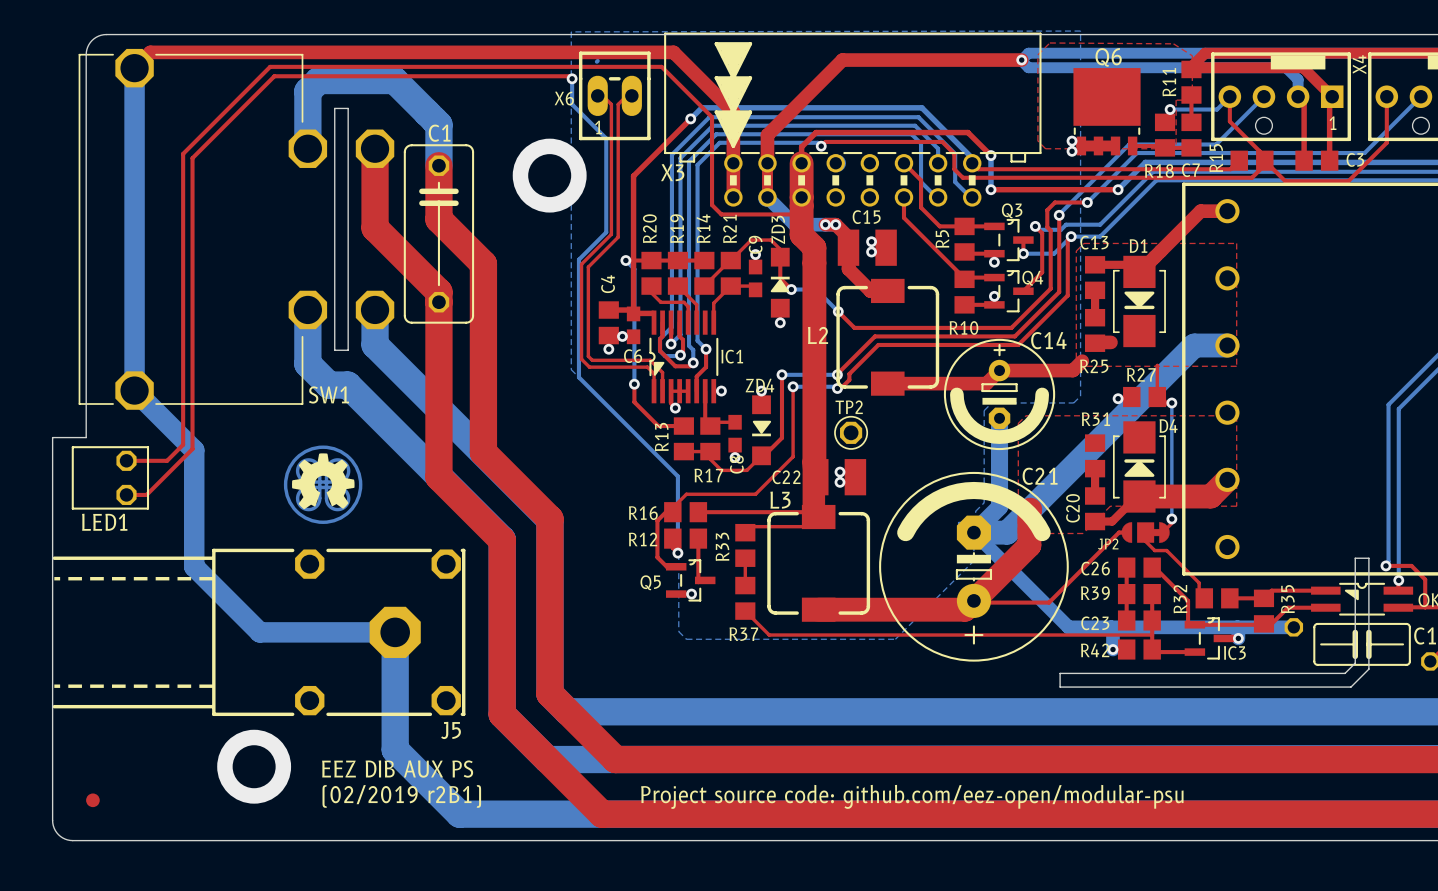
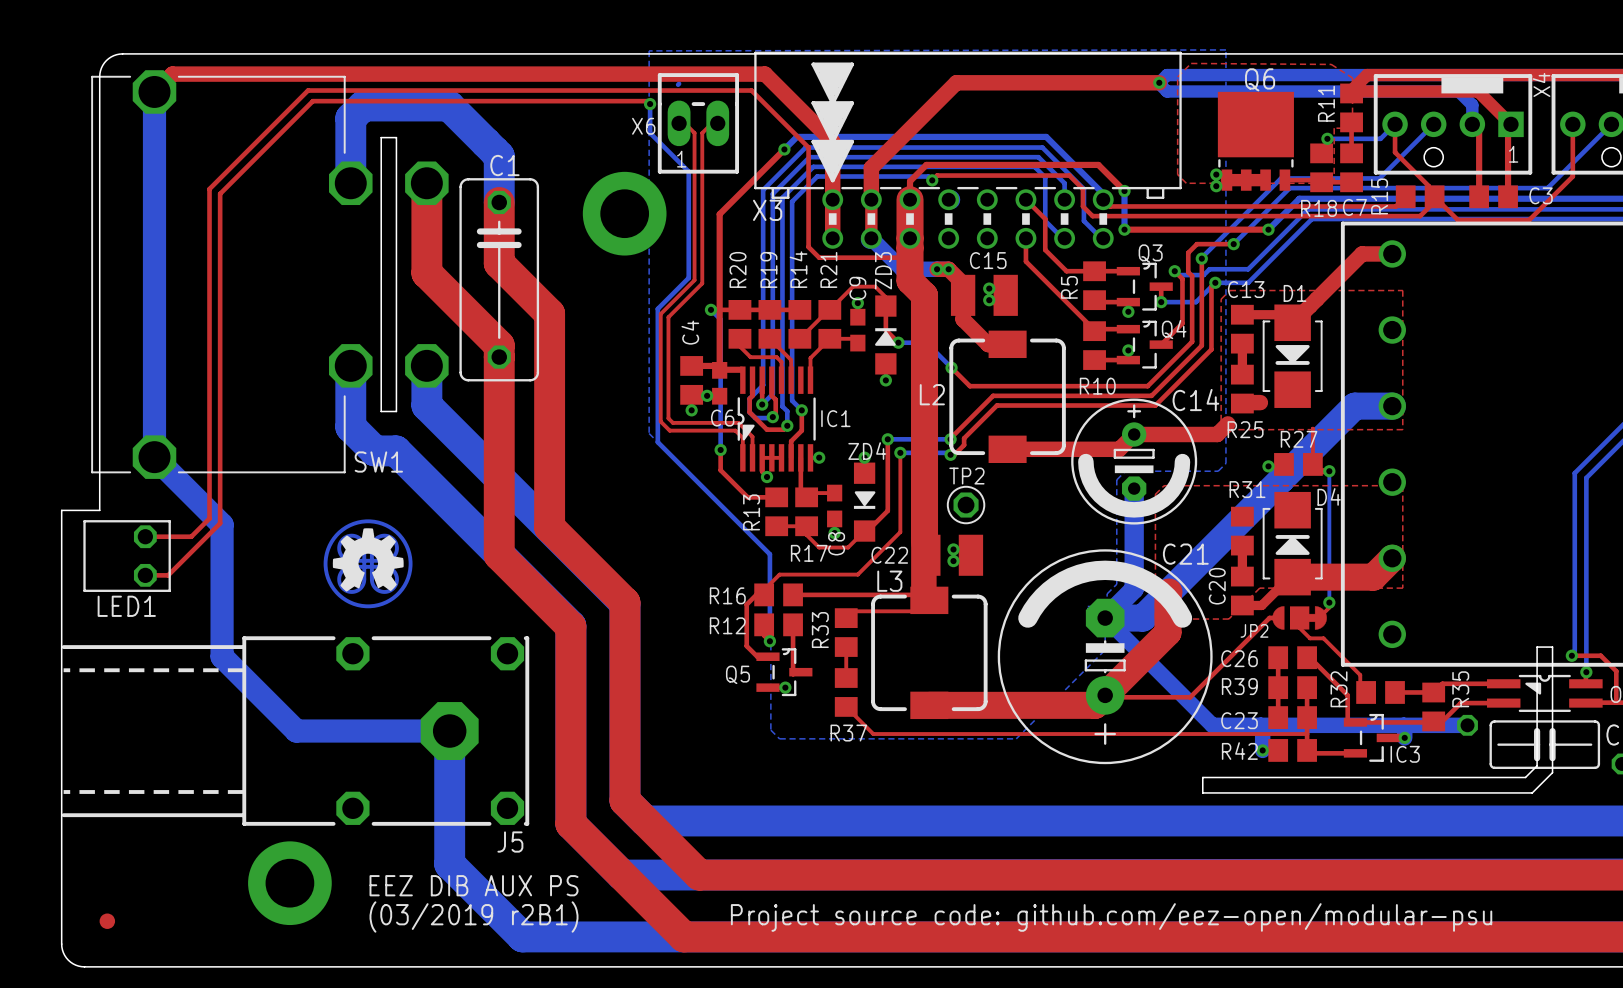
text: (02/2019 r2B1) (401, 796) -> (03/2019 r2B1) (474, 917)

